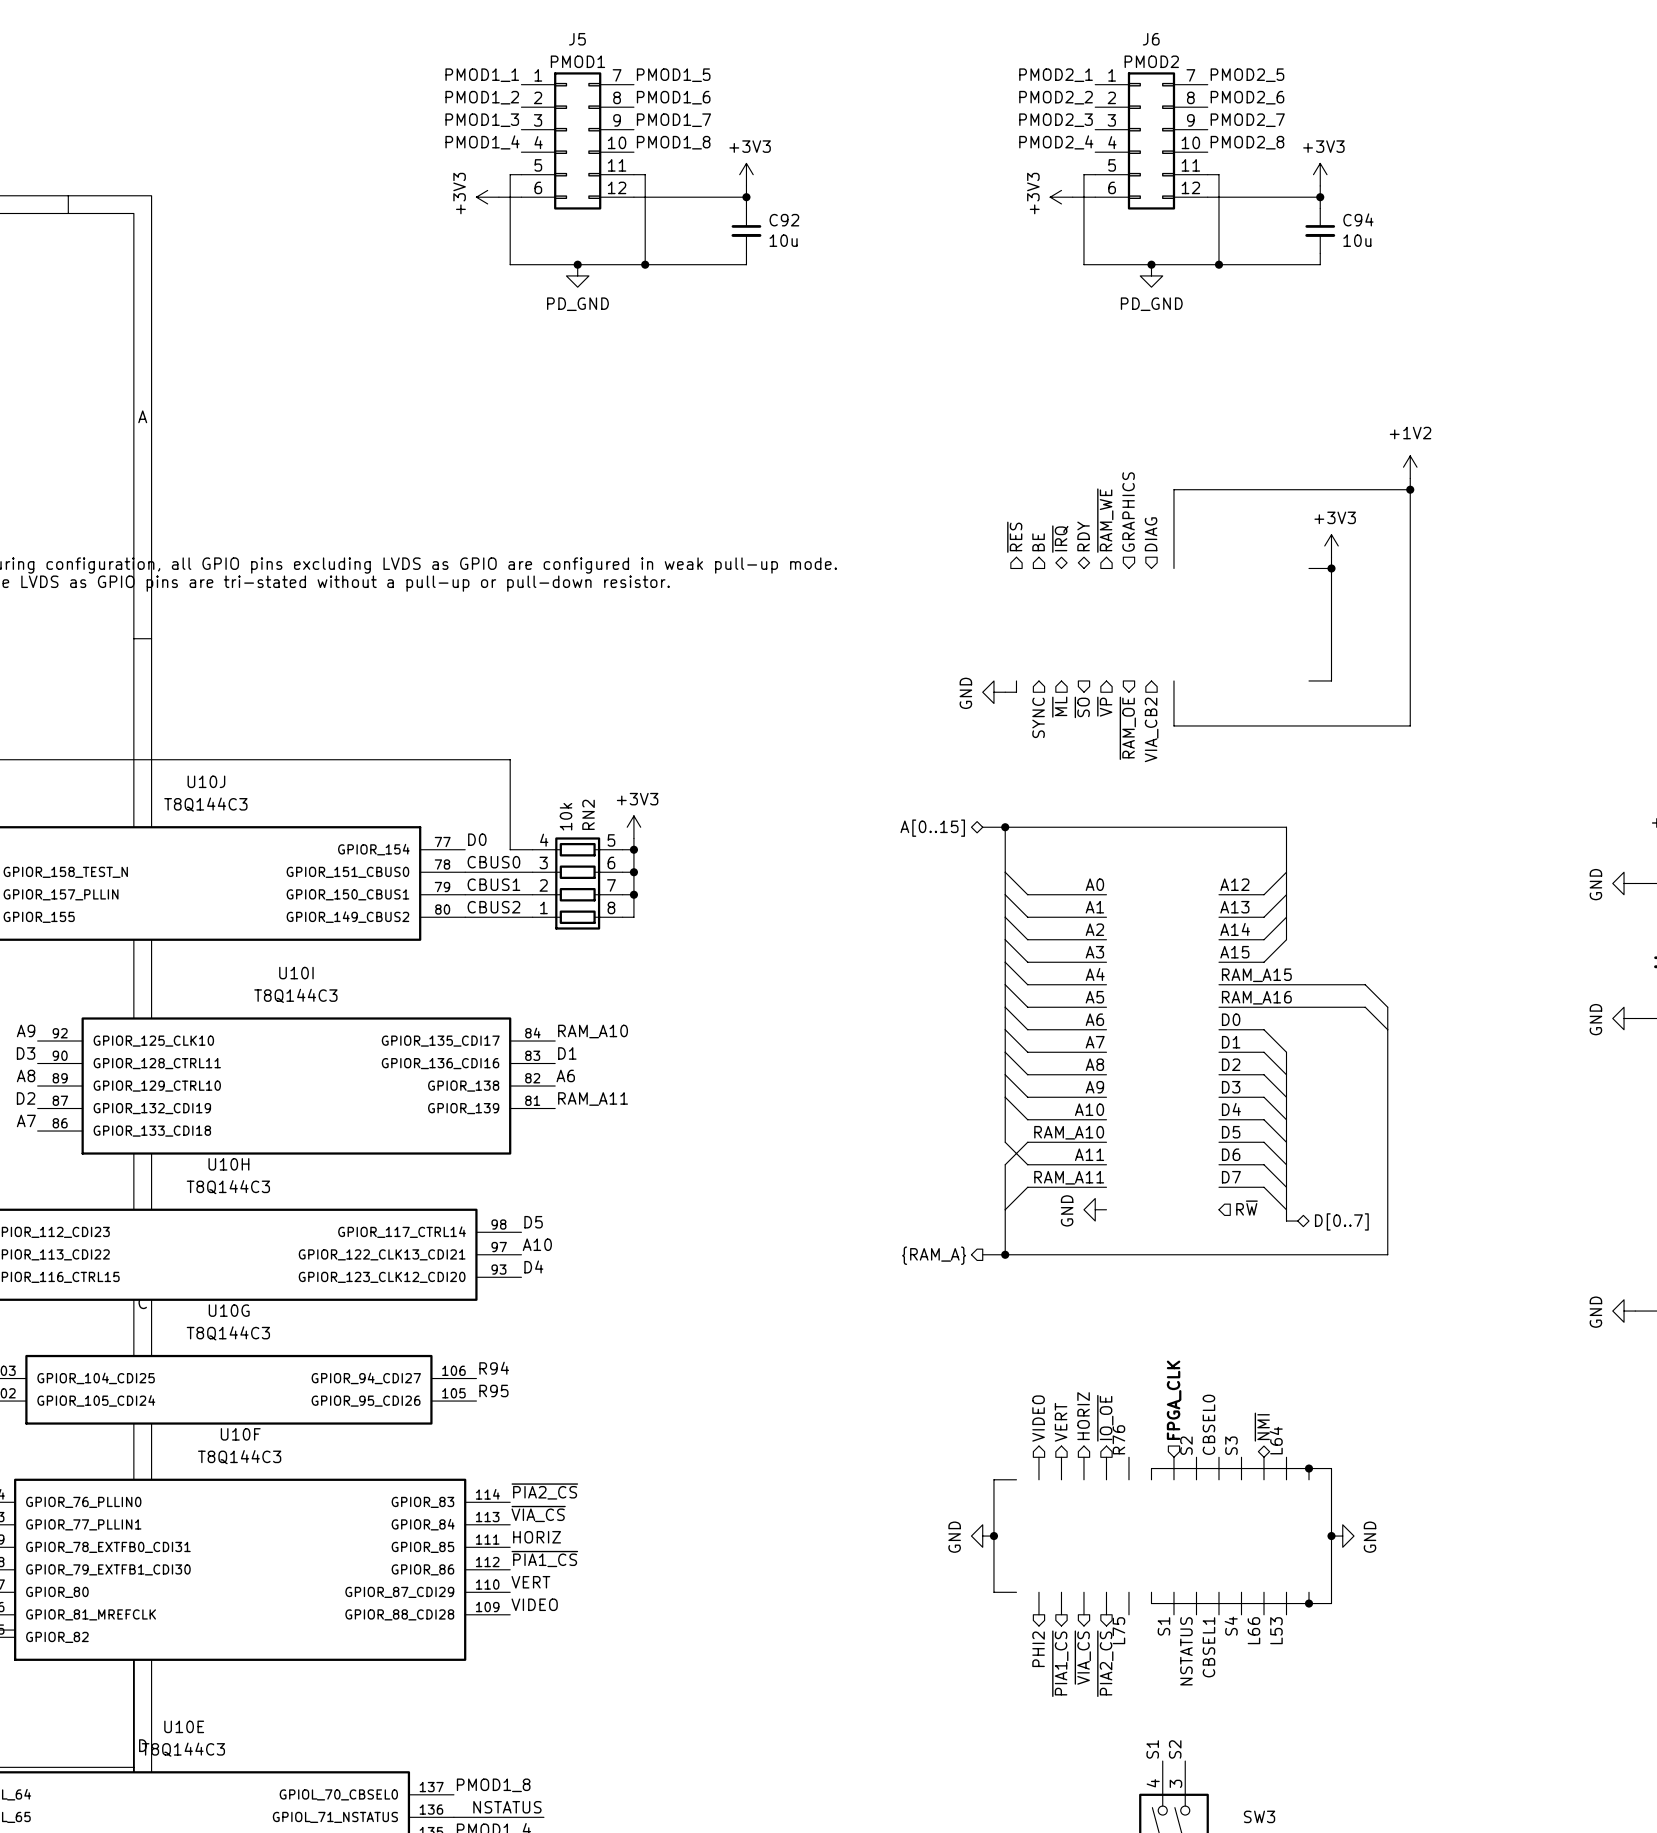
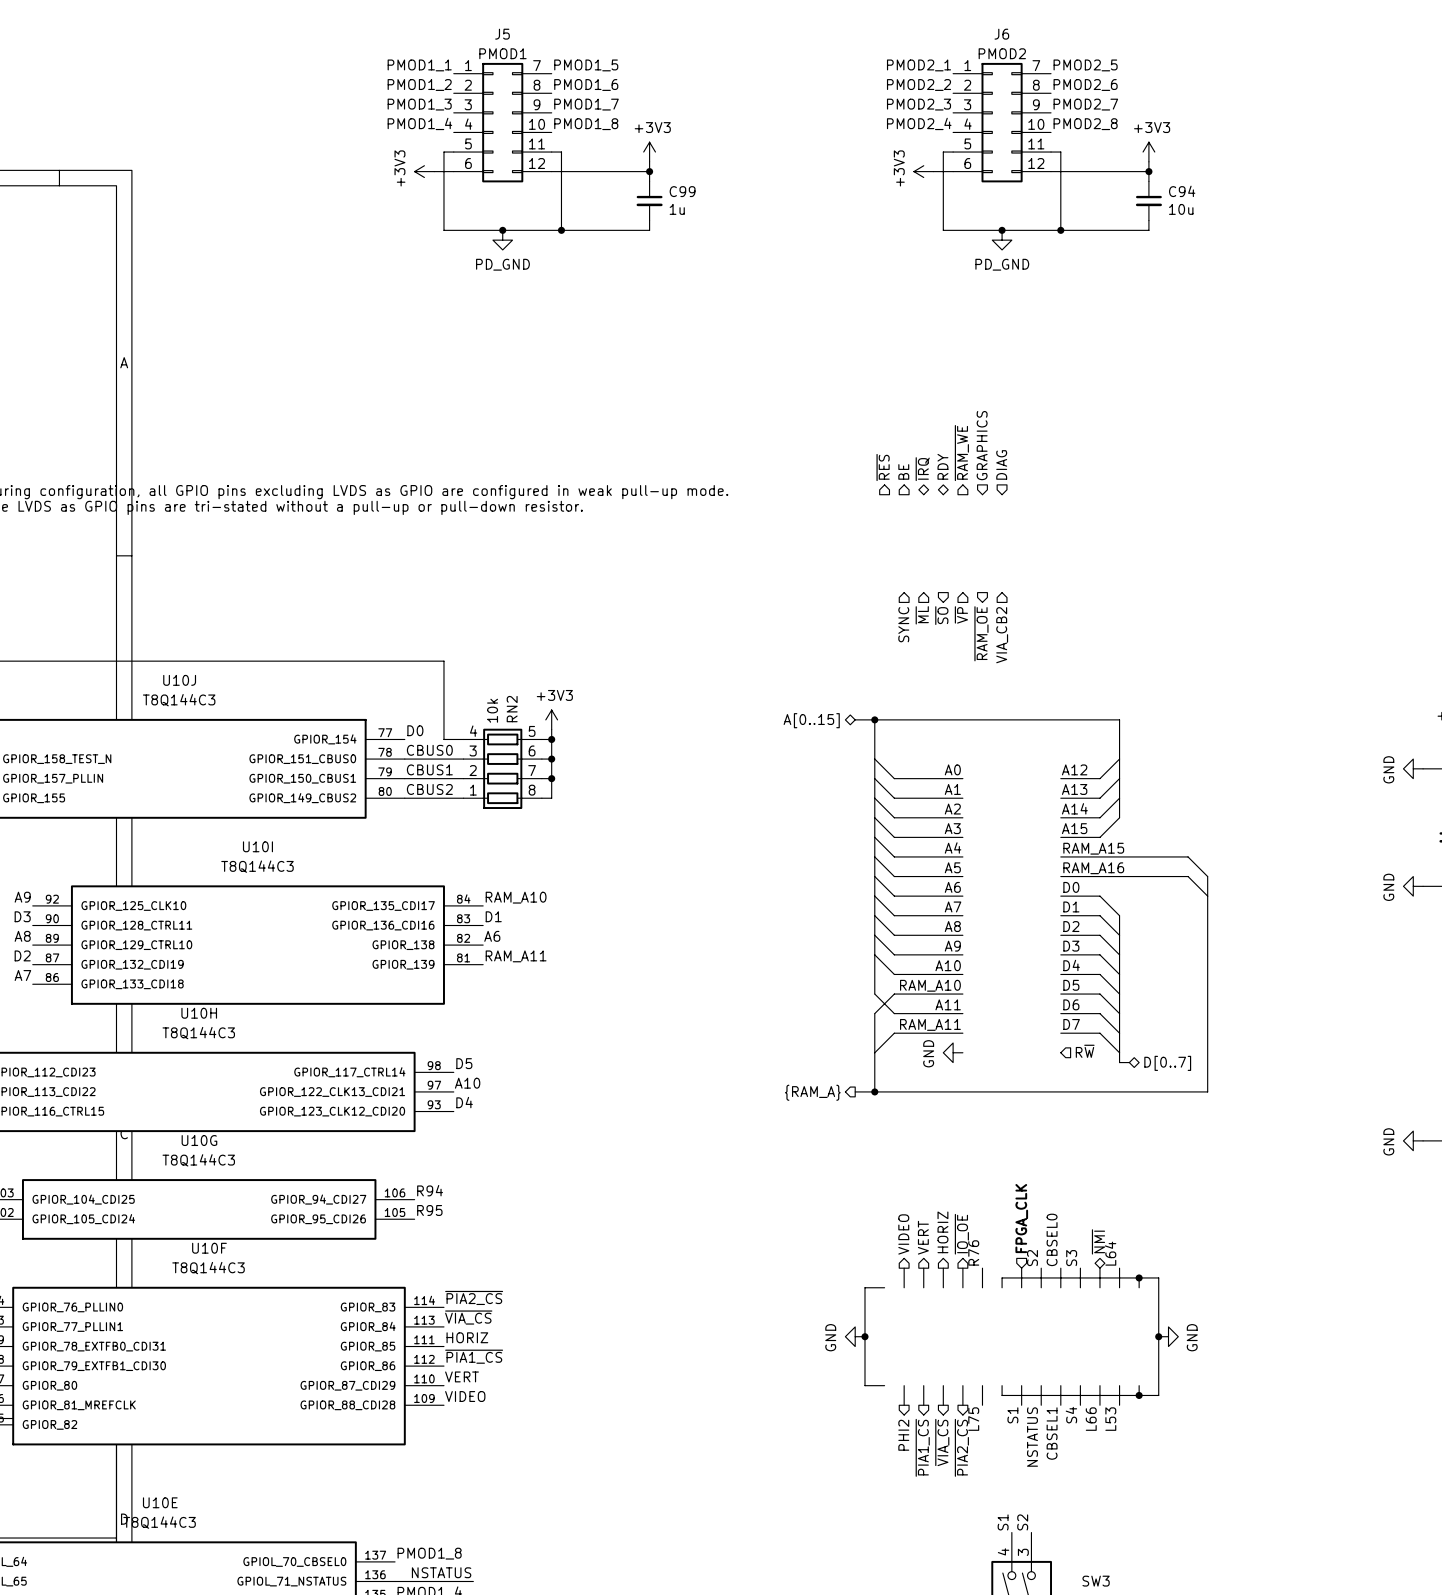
C92 name: C92 (784, 220) -> C99 (682, 191)
C92 value: 10u (783, 240) -> 1u (677, 209)
power symbol: +1V2 (1410, 467) -> none
wire: (1410, 478) (1410, 725) (1173, 725) (1173, 680) -> none
wire: (1410, 489) (1173, 489) (1173, 568) -> none
junction: (1410, 489) -> none
power symbol: +3V3 (1331, 545) -> none
wire: (1331, 557) (1331, 680) (1309, 680) -> none
wire: (1309, 568) (1331, 568) -> none
junction: (1331, 568) -> none
wire: (1016, 680) (1016, 692) (1005, 692) -> none
power symbol: GND (993, 692) -> none

